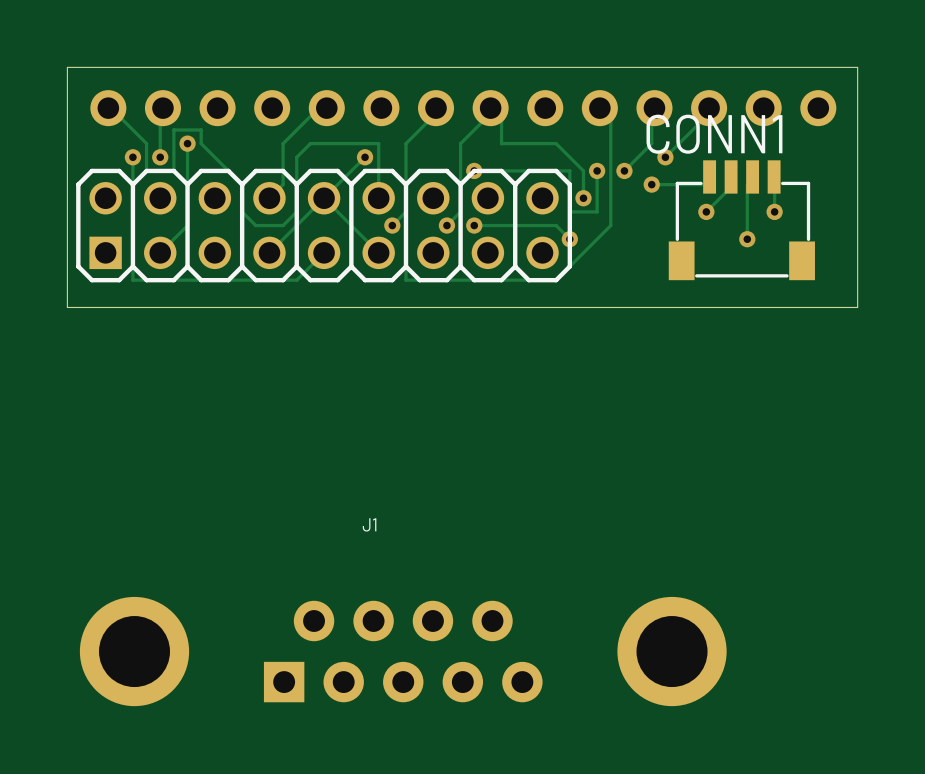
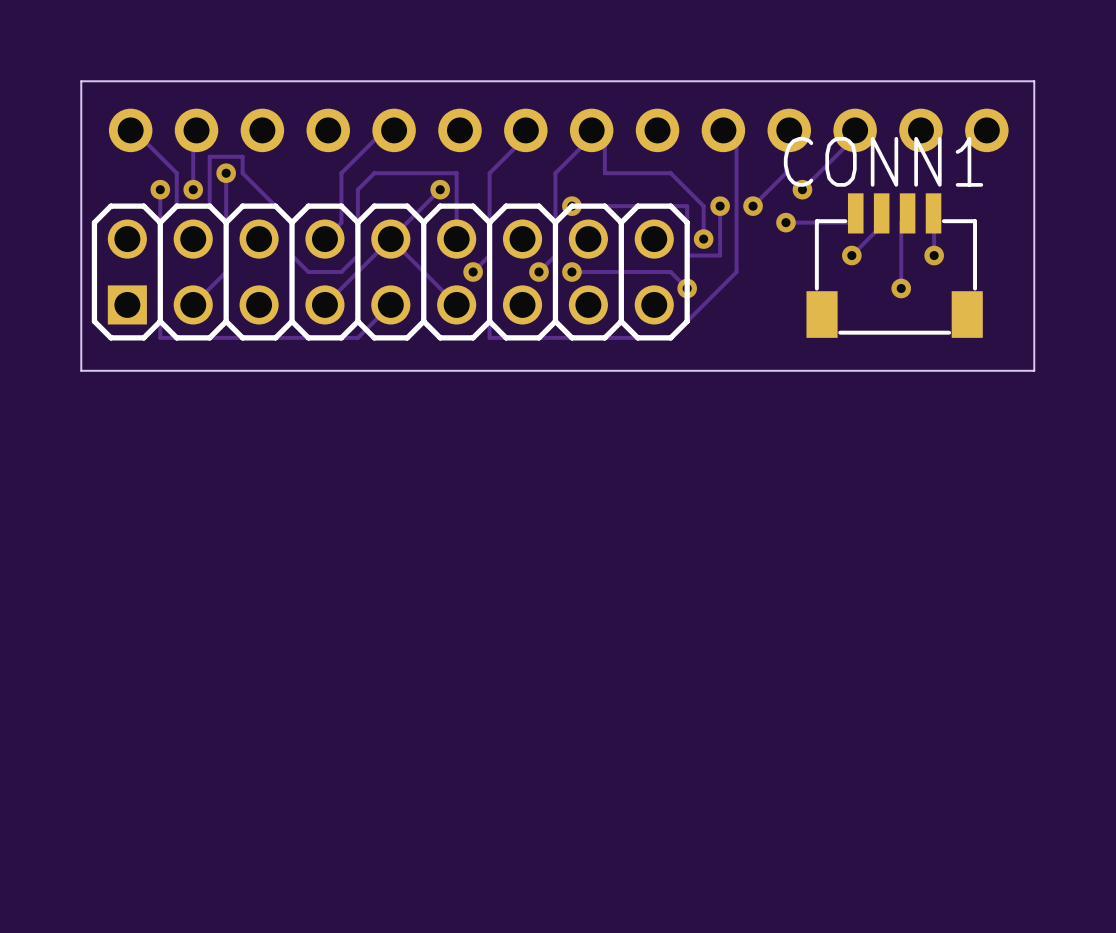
J1: (403, 651) -> none

